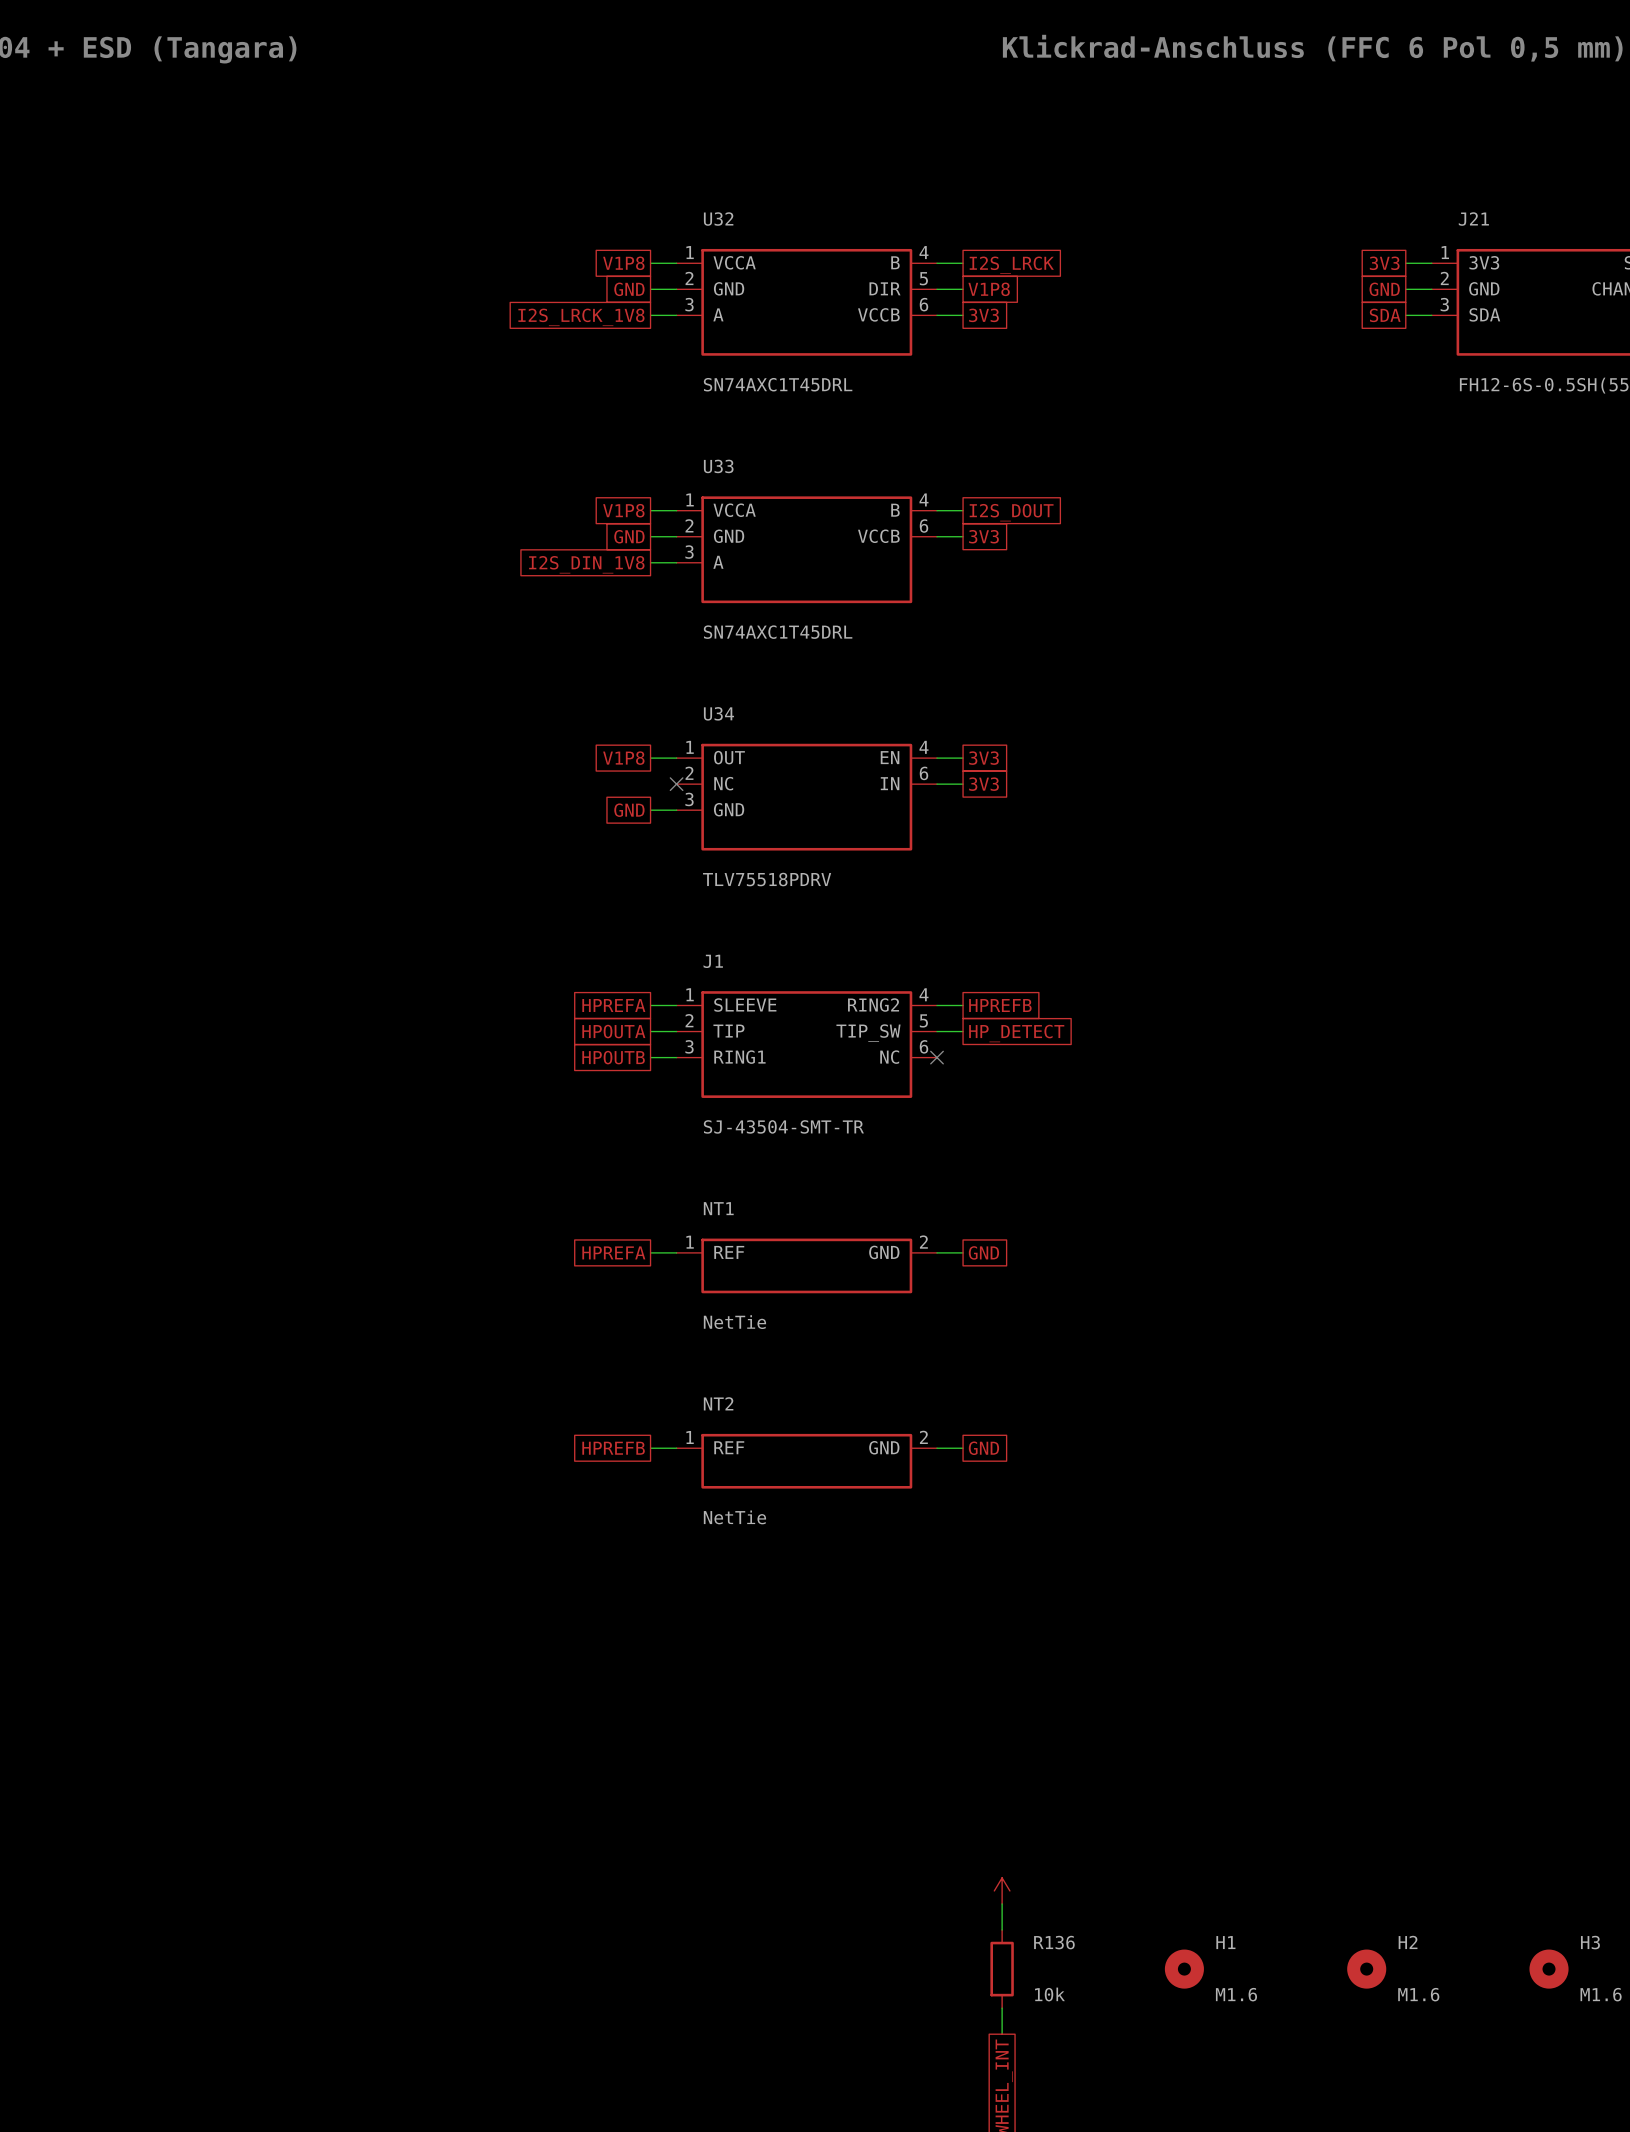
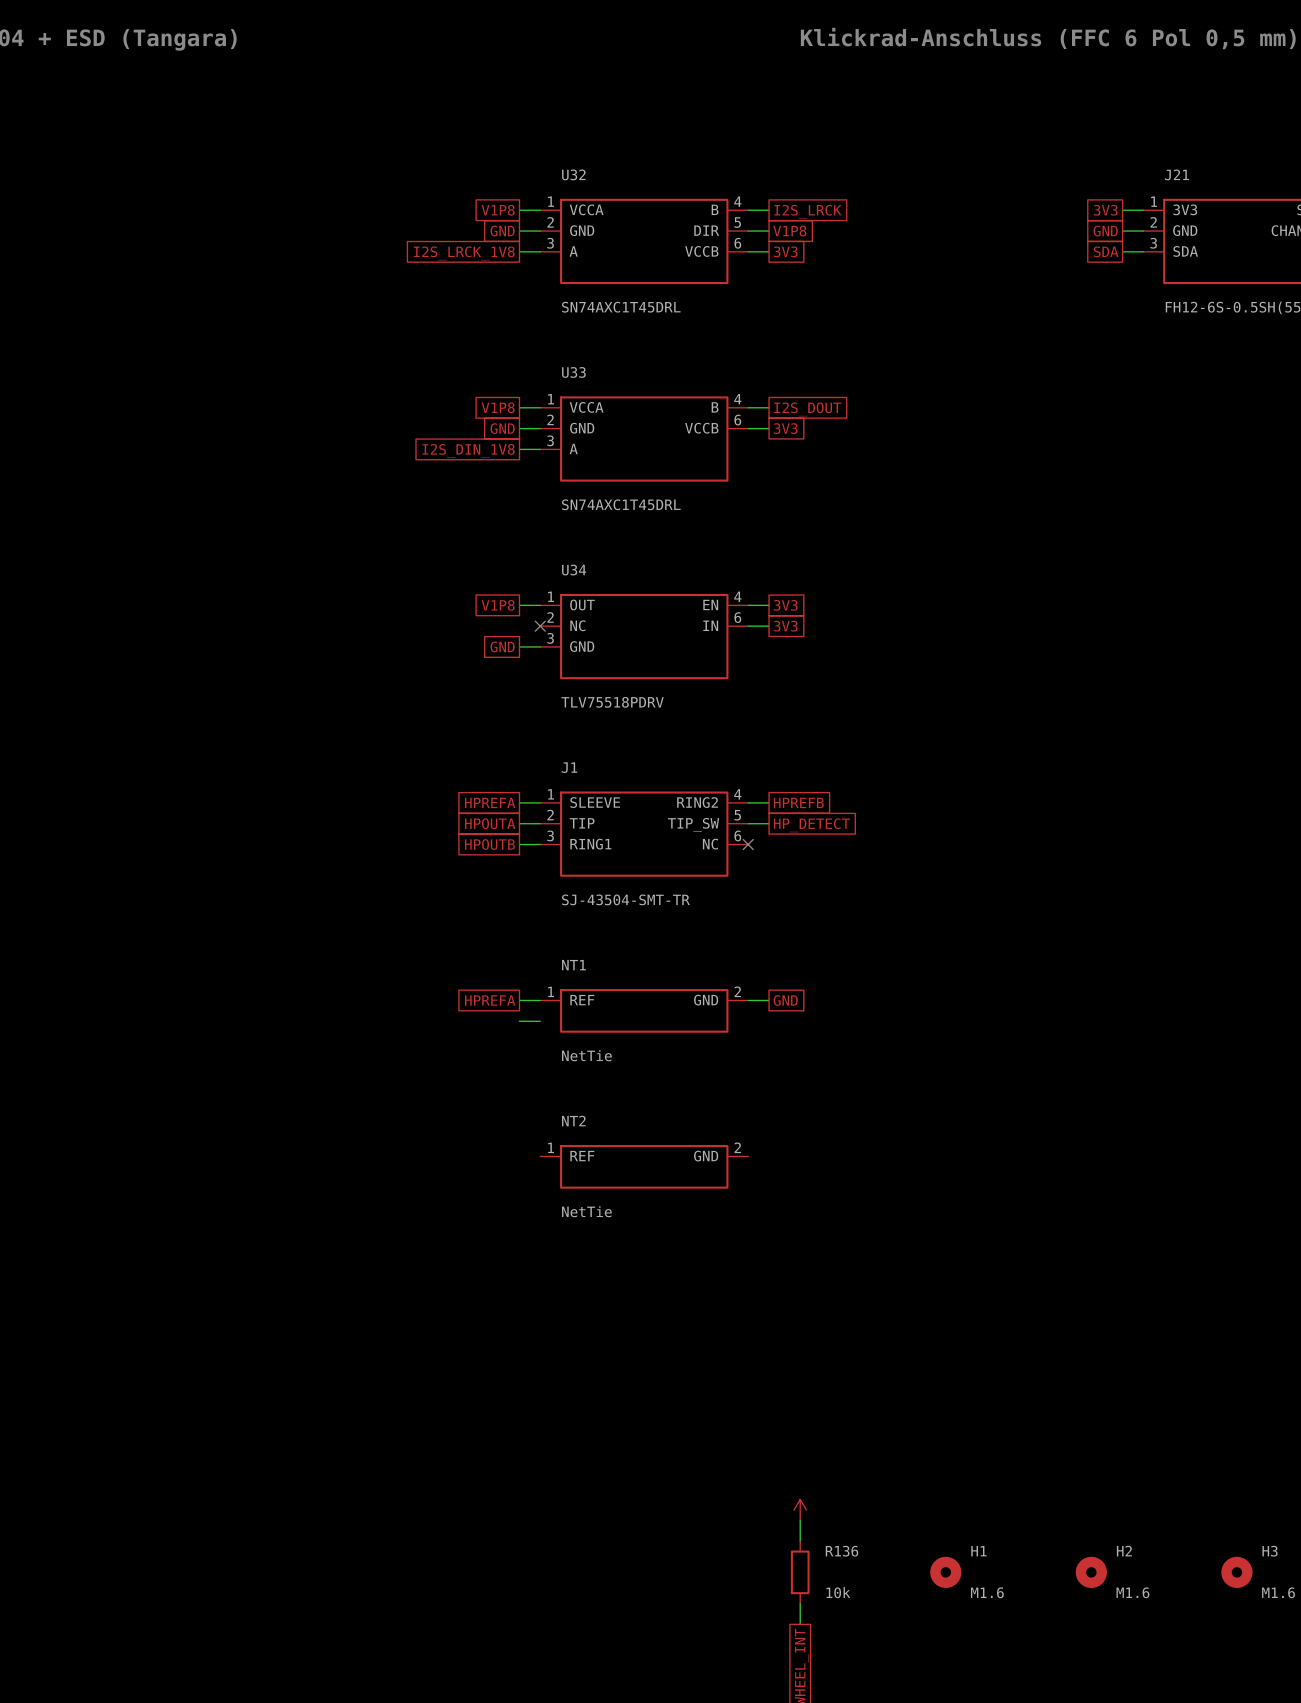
global label: HPREFB (613, 1448) -> none
wire: (650, 1448) (676, 1448) -> (519, 1021) (540, 1021)
wire: (937, 1448) (963, 1448) -> none
global label: GND (983, 1448) -> none

